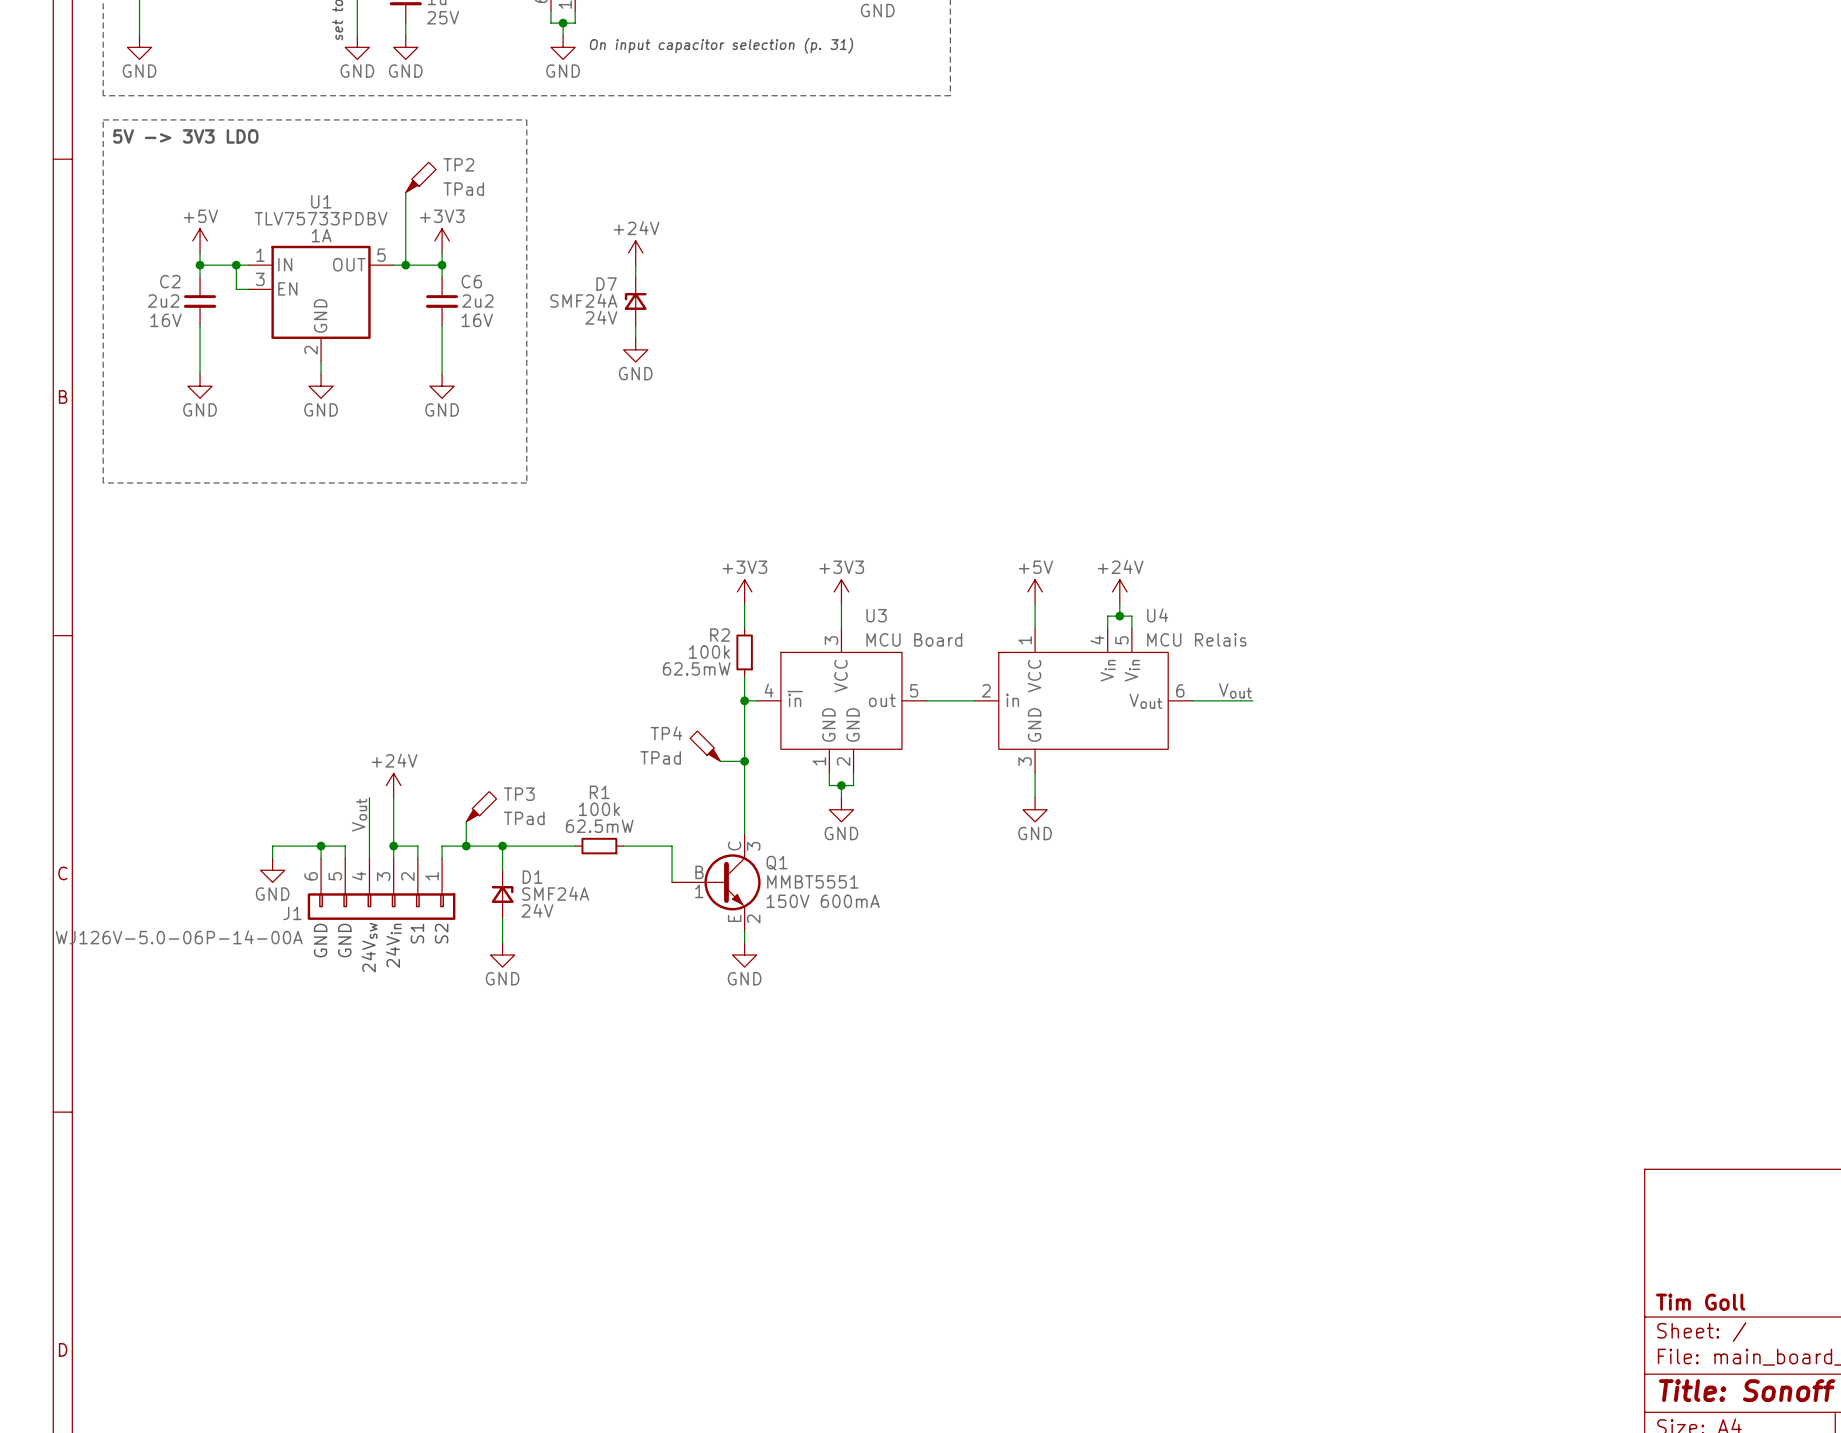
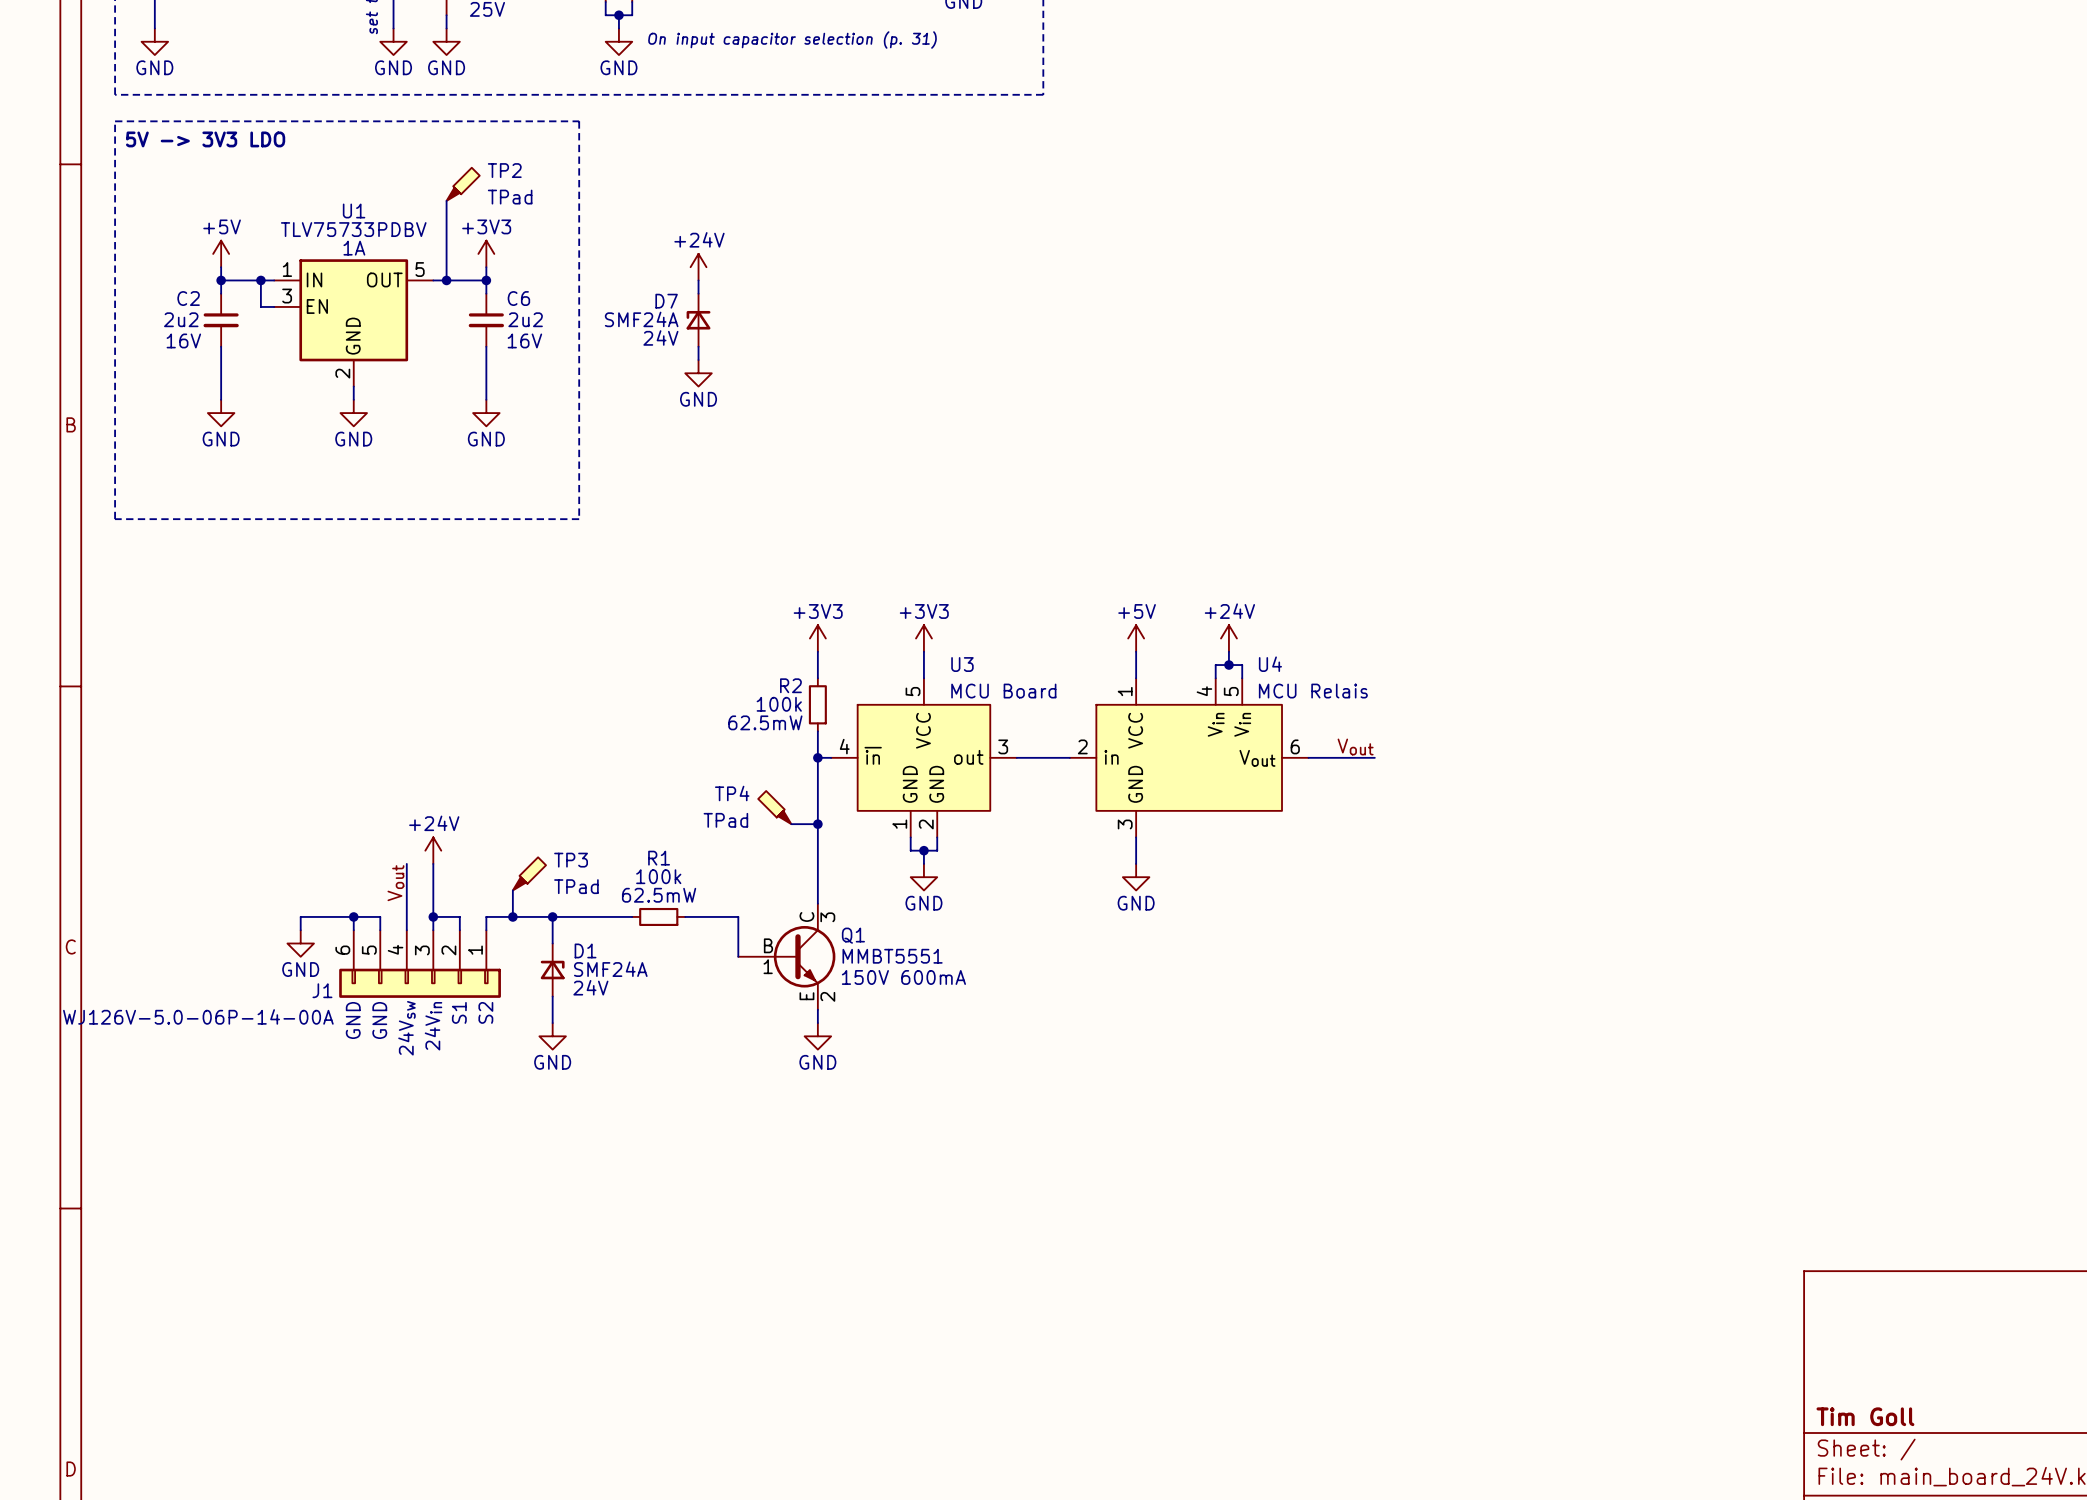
U3 pin number: 3 (831, 640) -> 5 (913, 691)
U3 pin number: 5 (914, 690) -> 3 (1003, 746)

